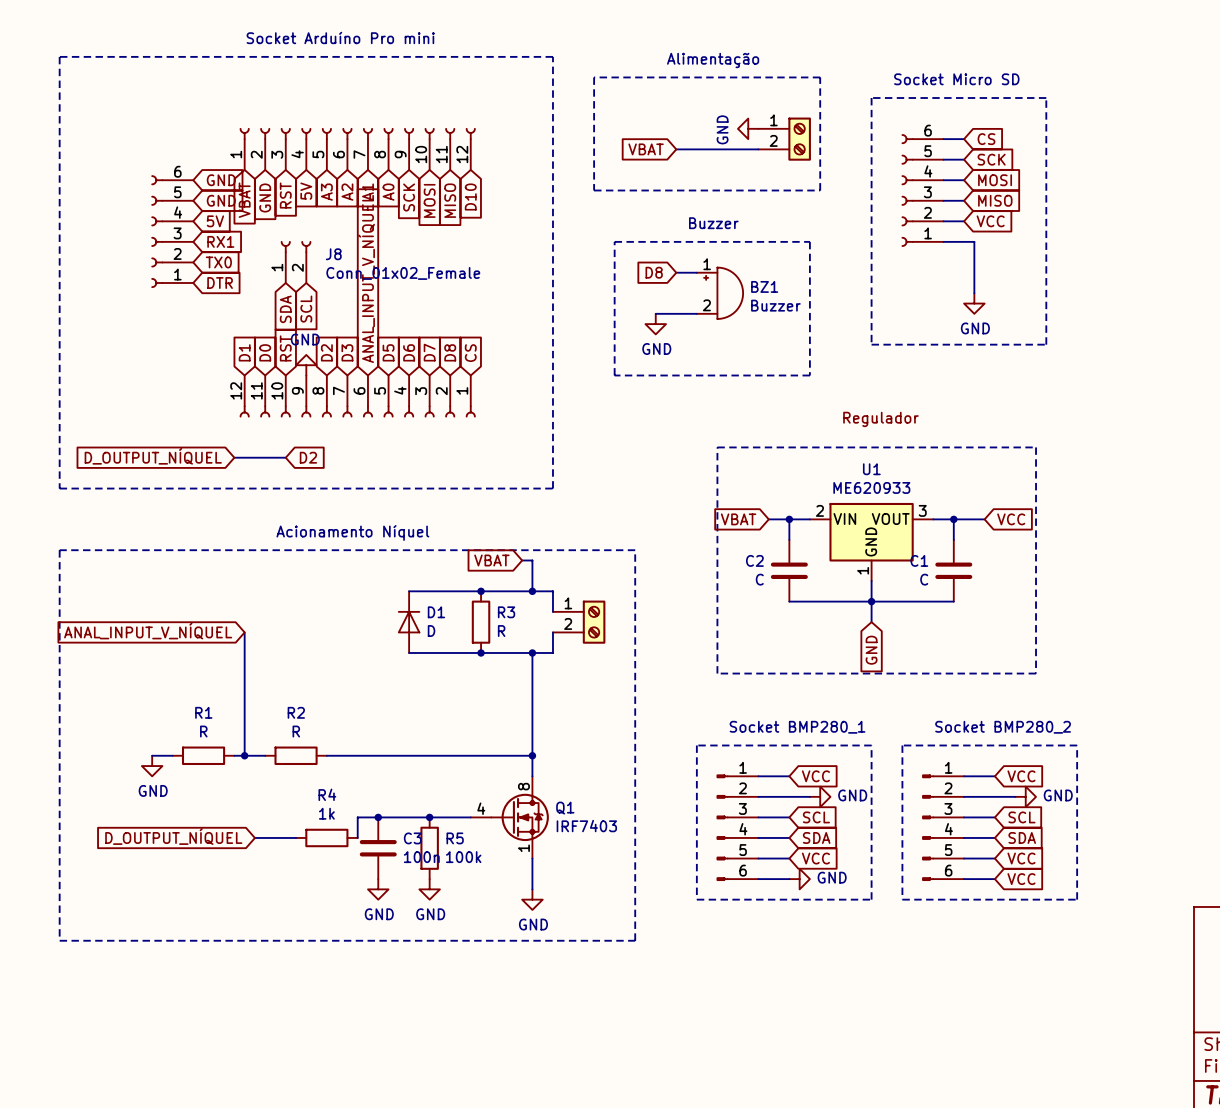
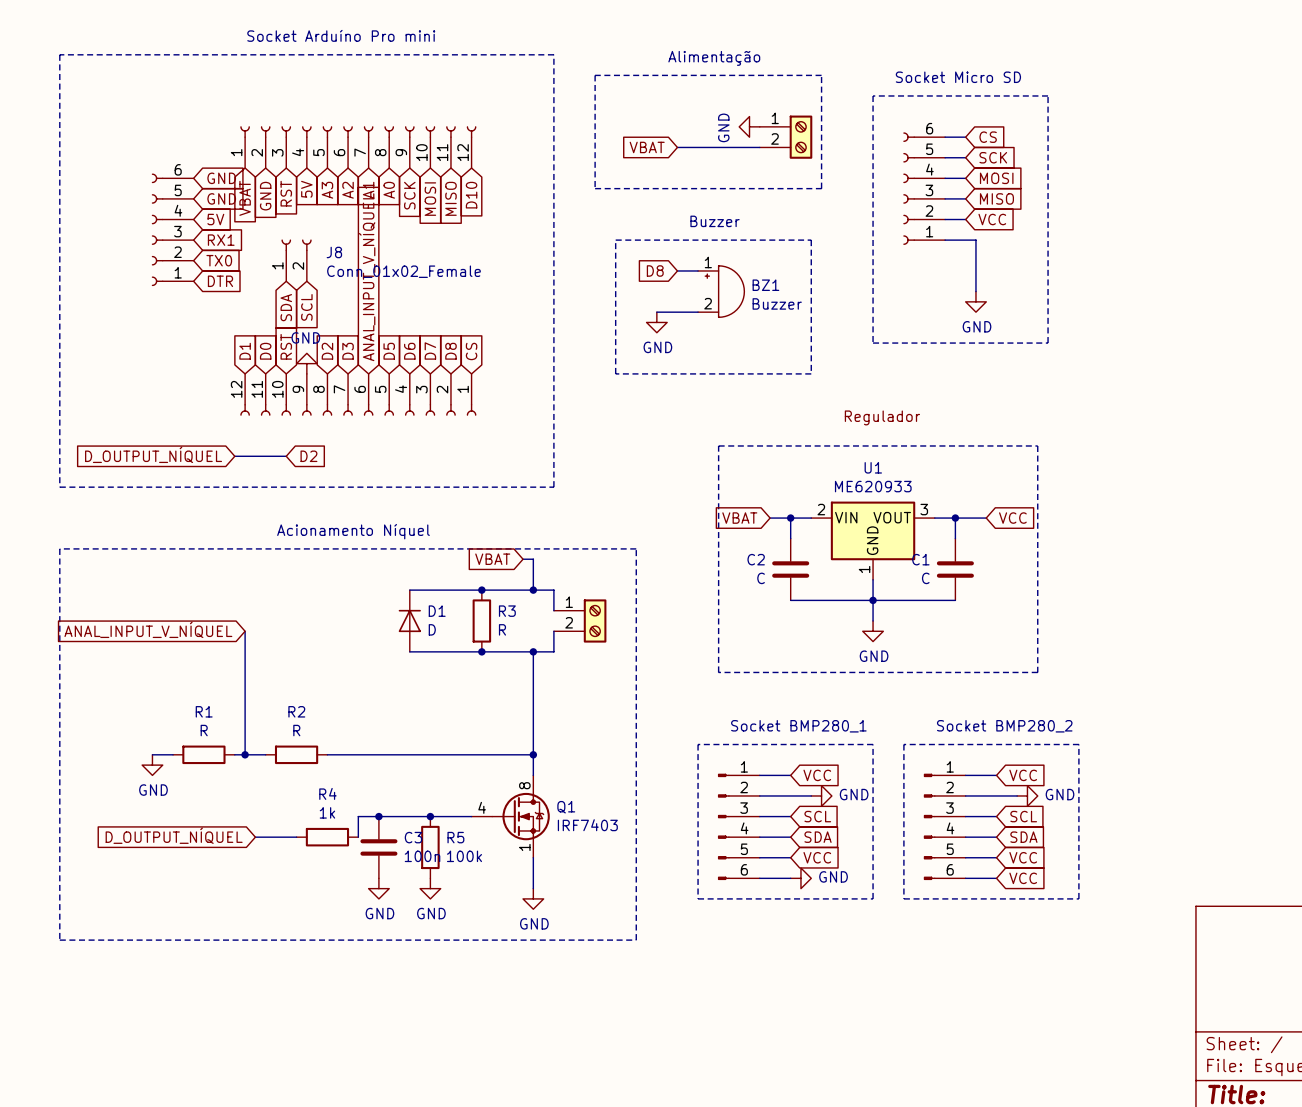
power symbol: none -> GND (873, 631)
global label: GND (871, 650) -> none

